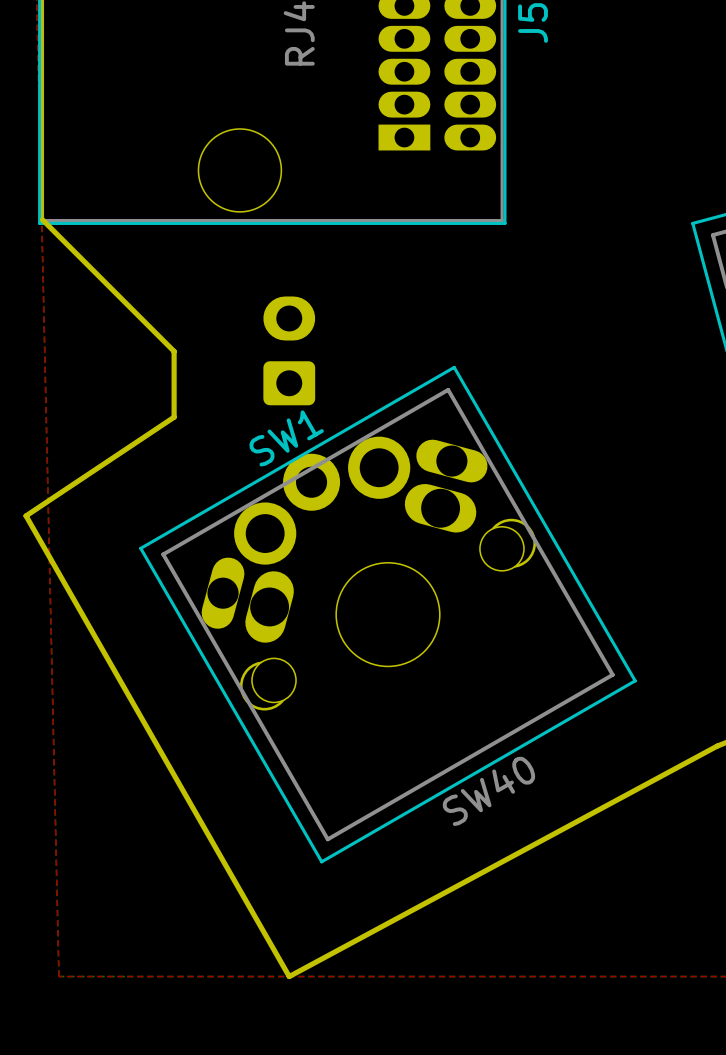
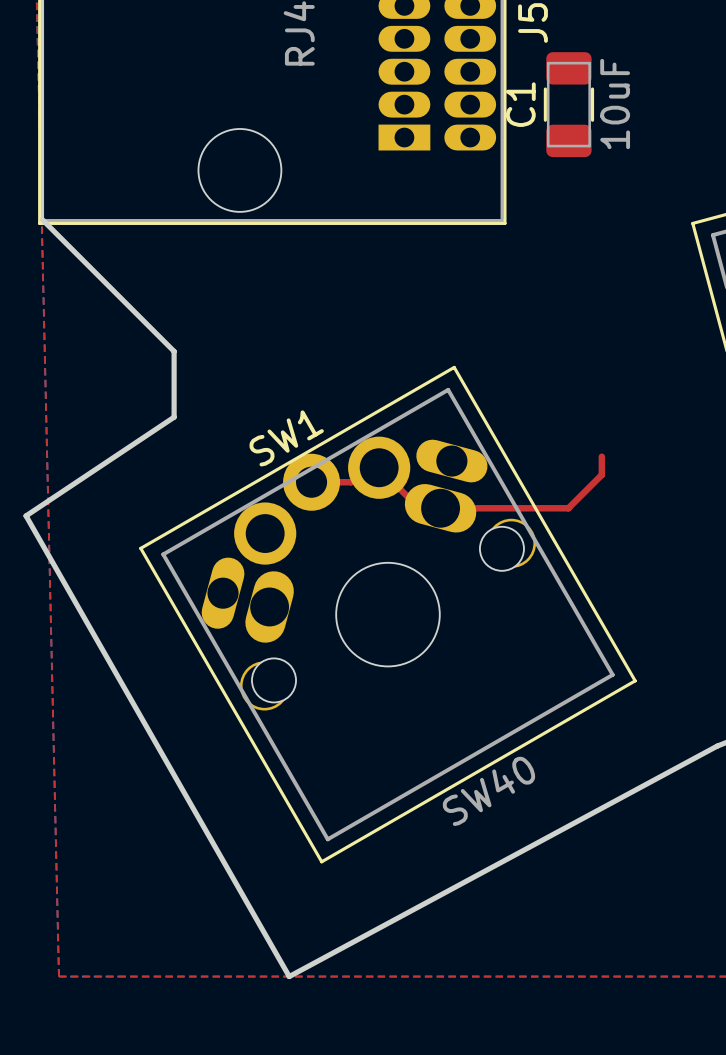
C1: none -> 10uF (568, 104)
part: (289, 350) -> none
top track: none -> (601, 456) (601, 474) (568, 508) (419, 508) (378, 467) (365, 467) (351, 482) (311, 482)

